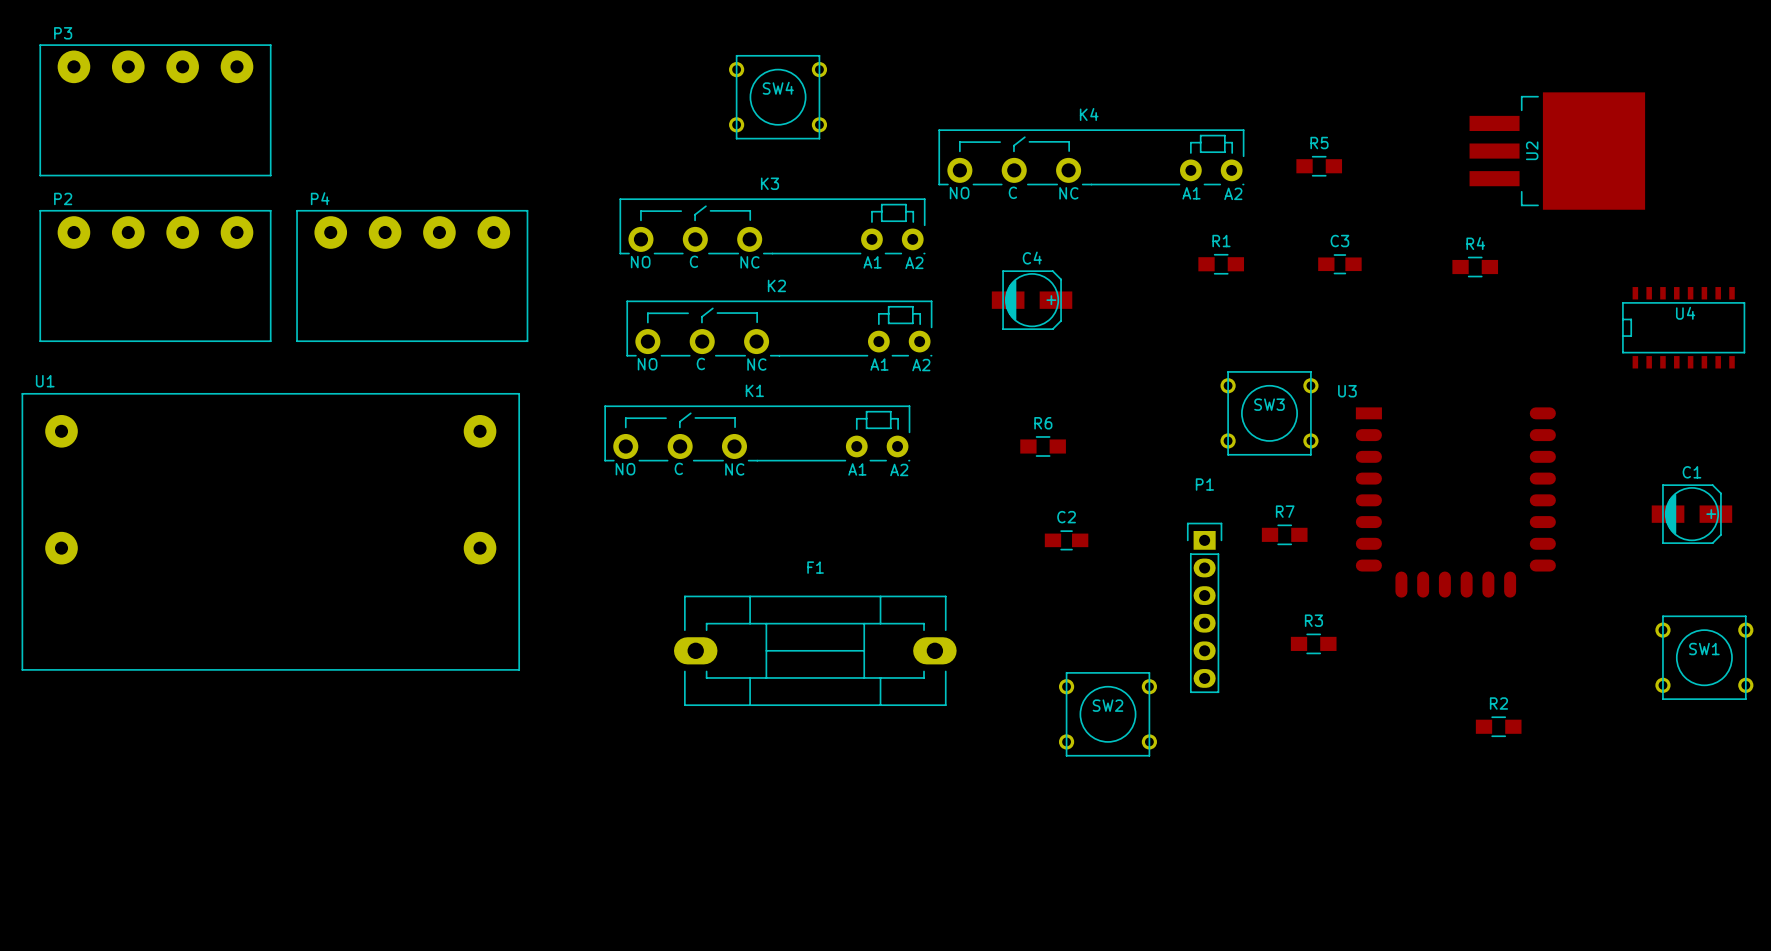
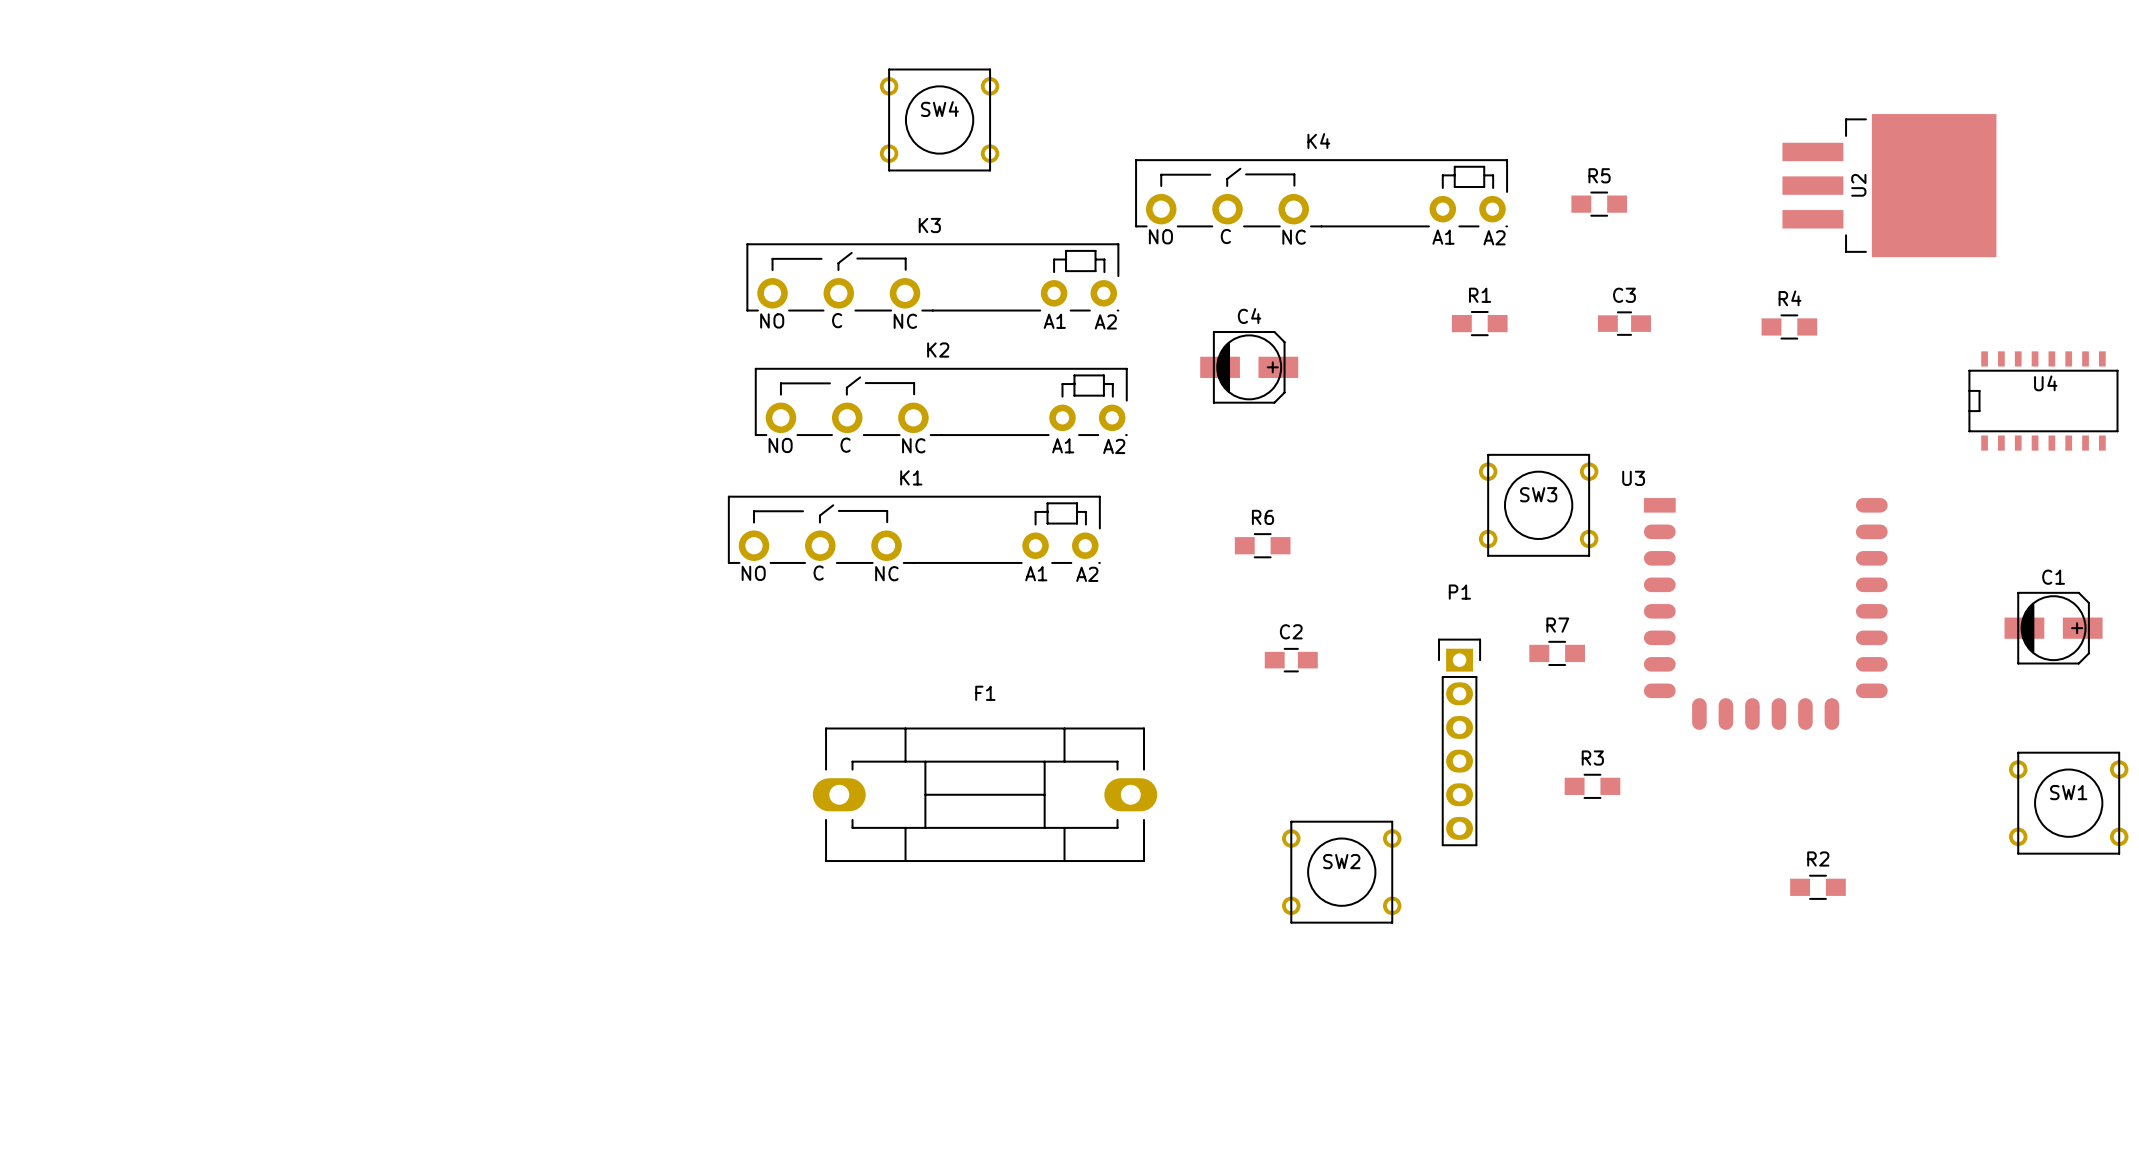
P3: (155, 110) -> none
P2: (155, 275) -> none
P4: (412, 275) -> none
U1: (270, 531) -> none

